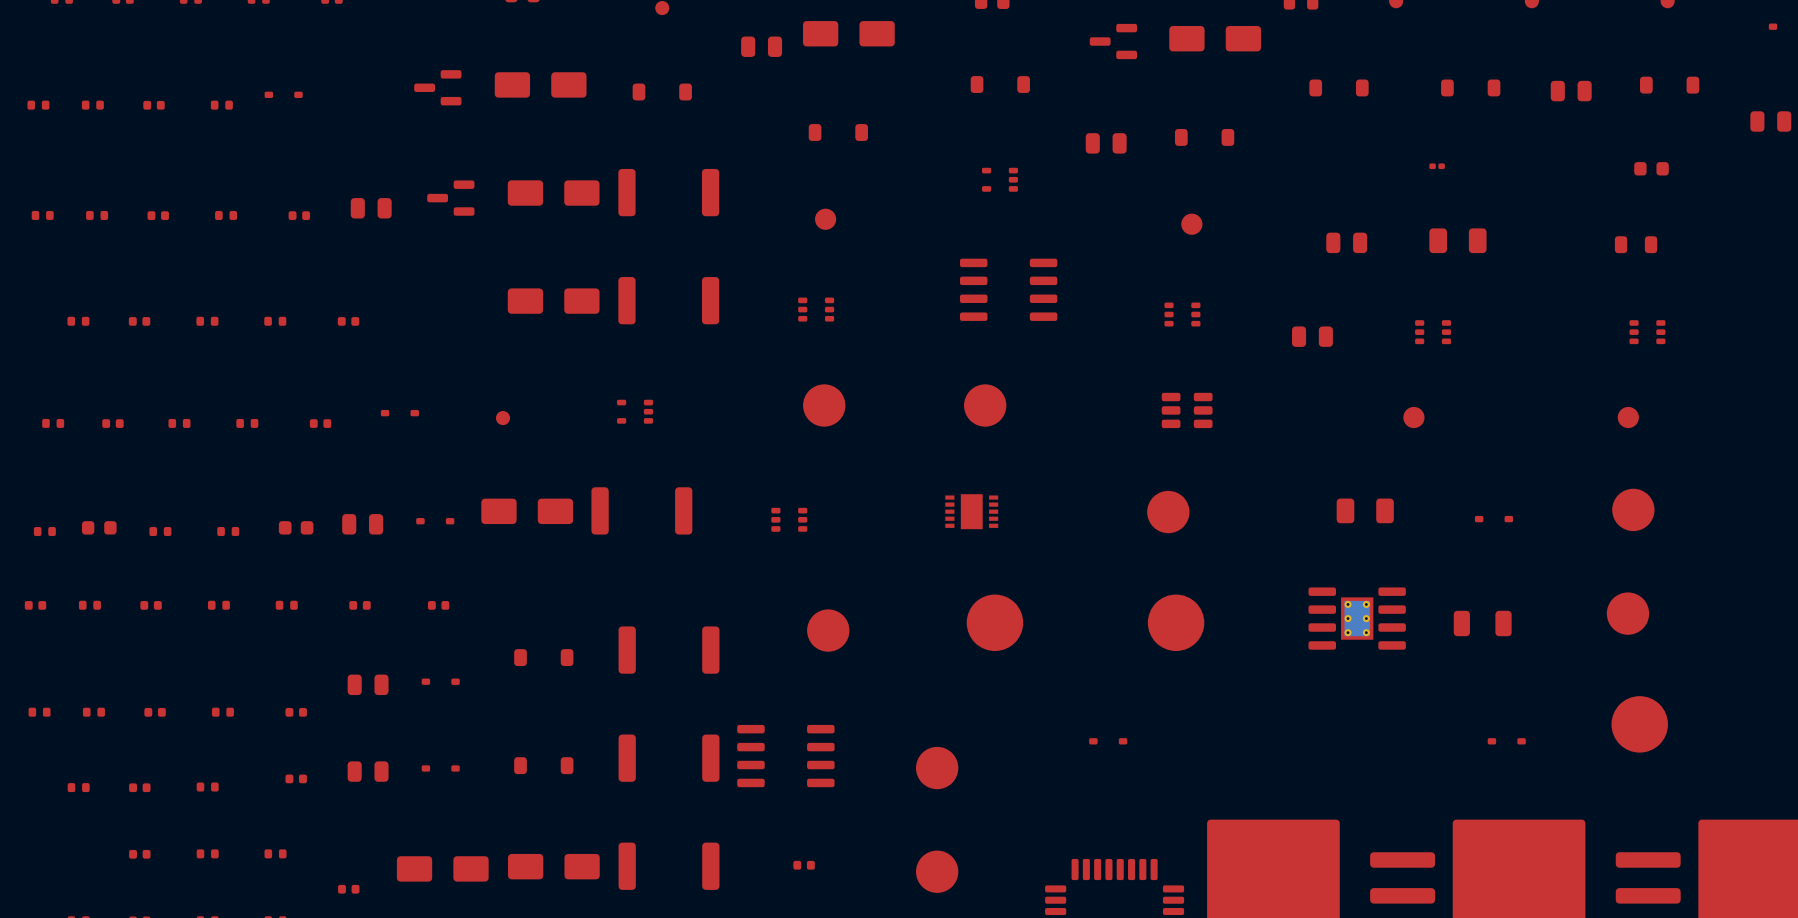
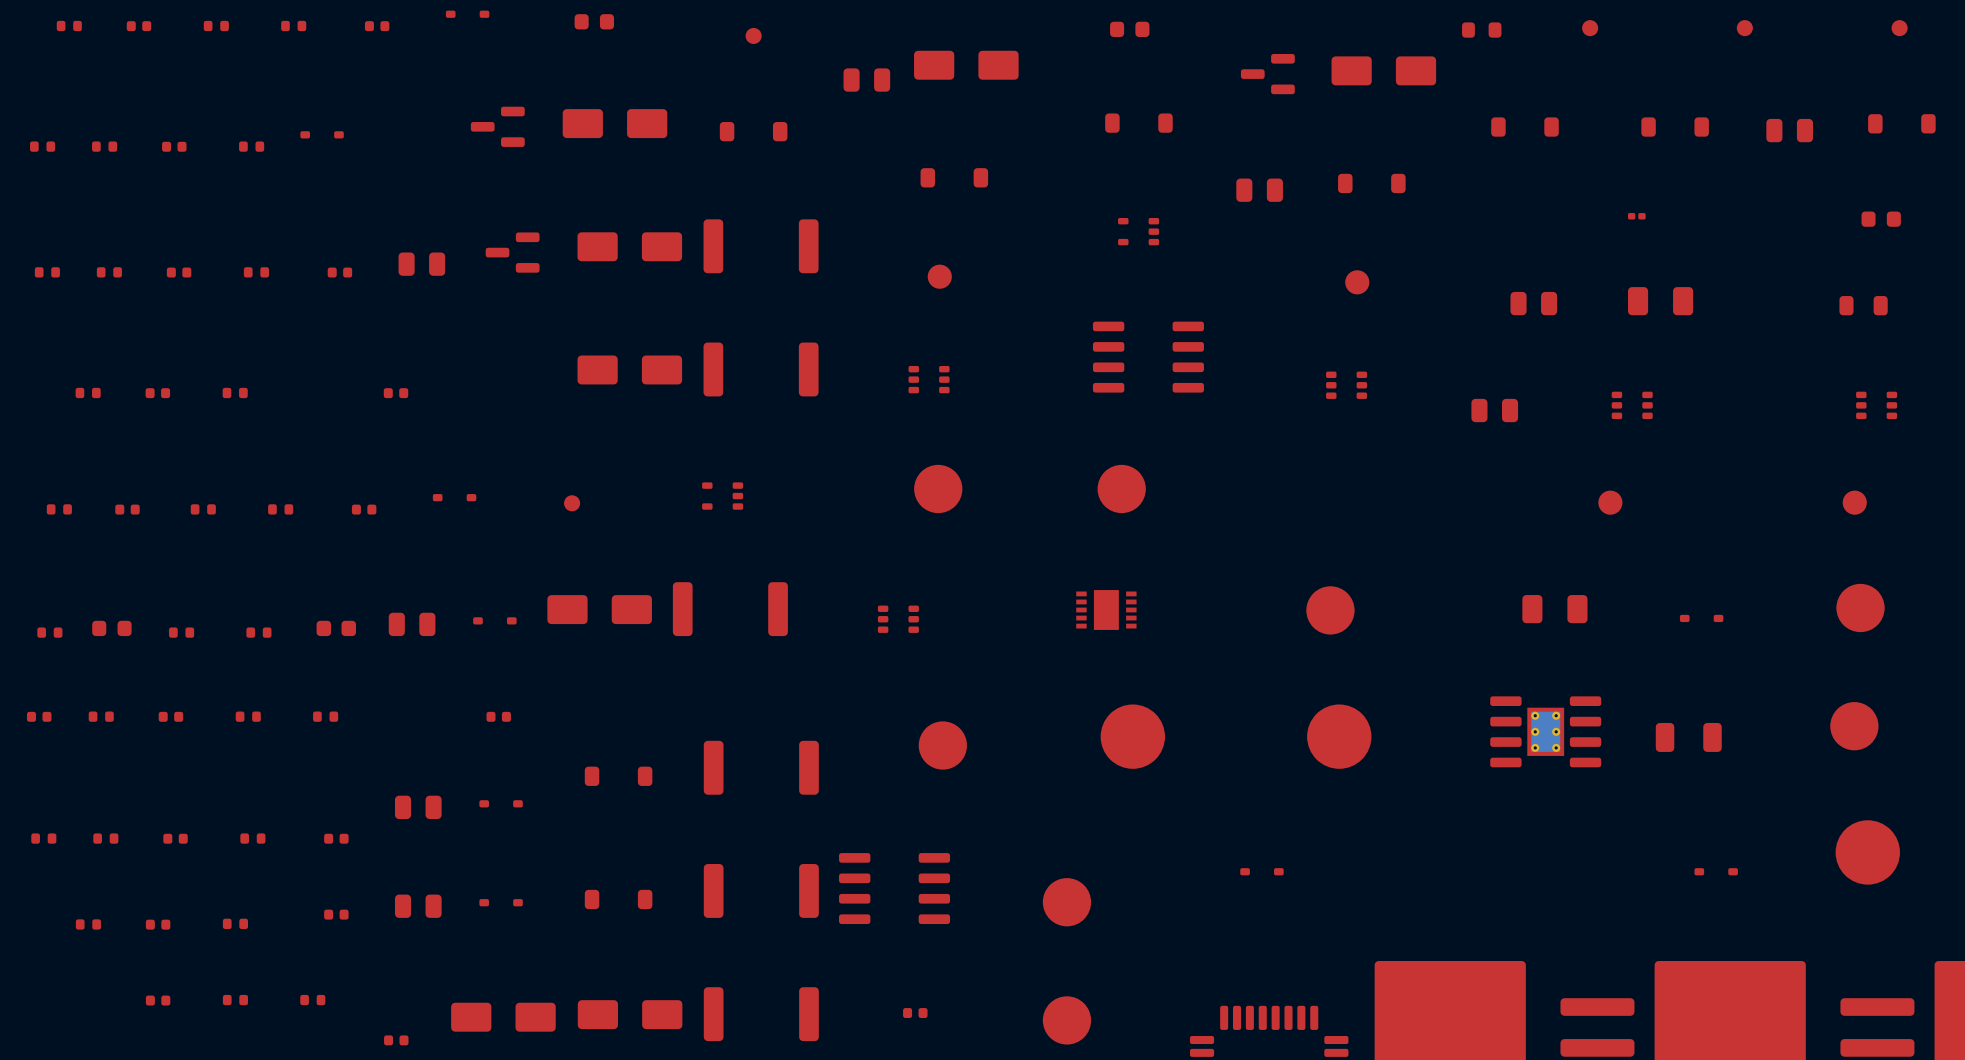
part: (275, 321) -> none
part: (1187, 410) -> none
part: (360, 605) -> none

